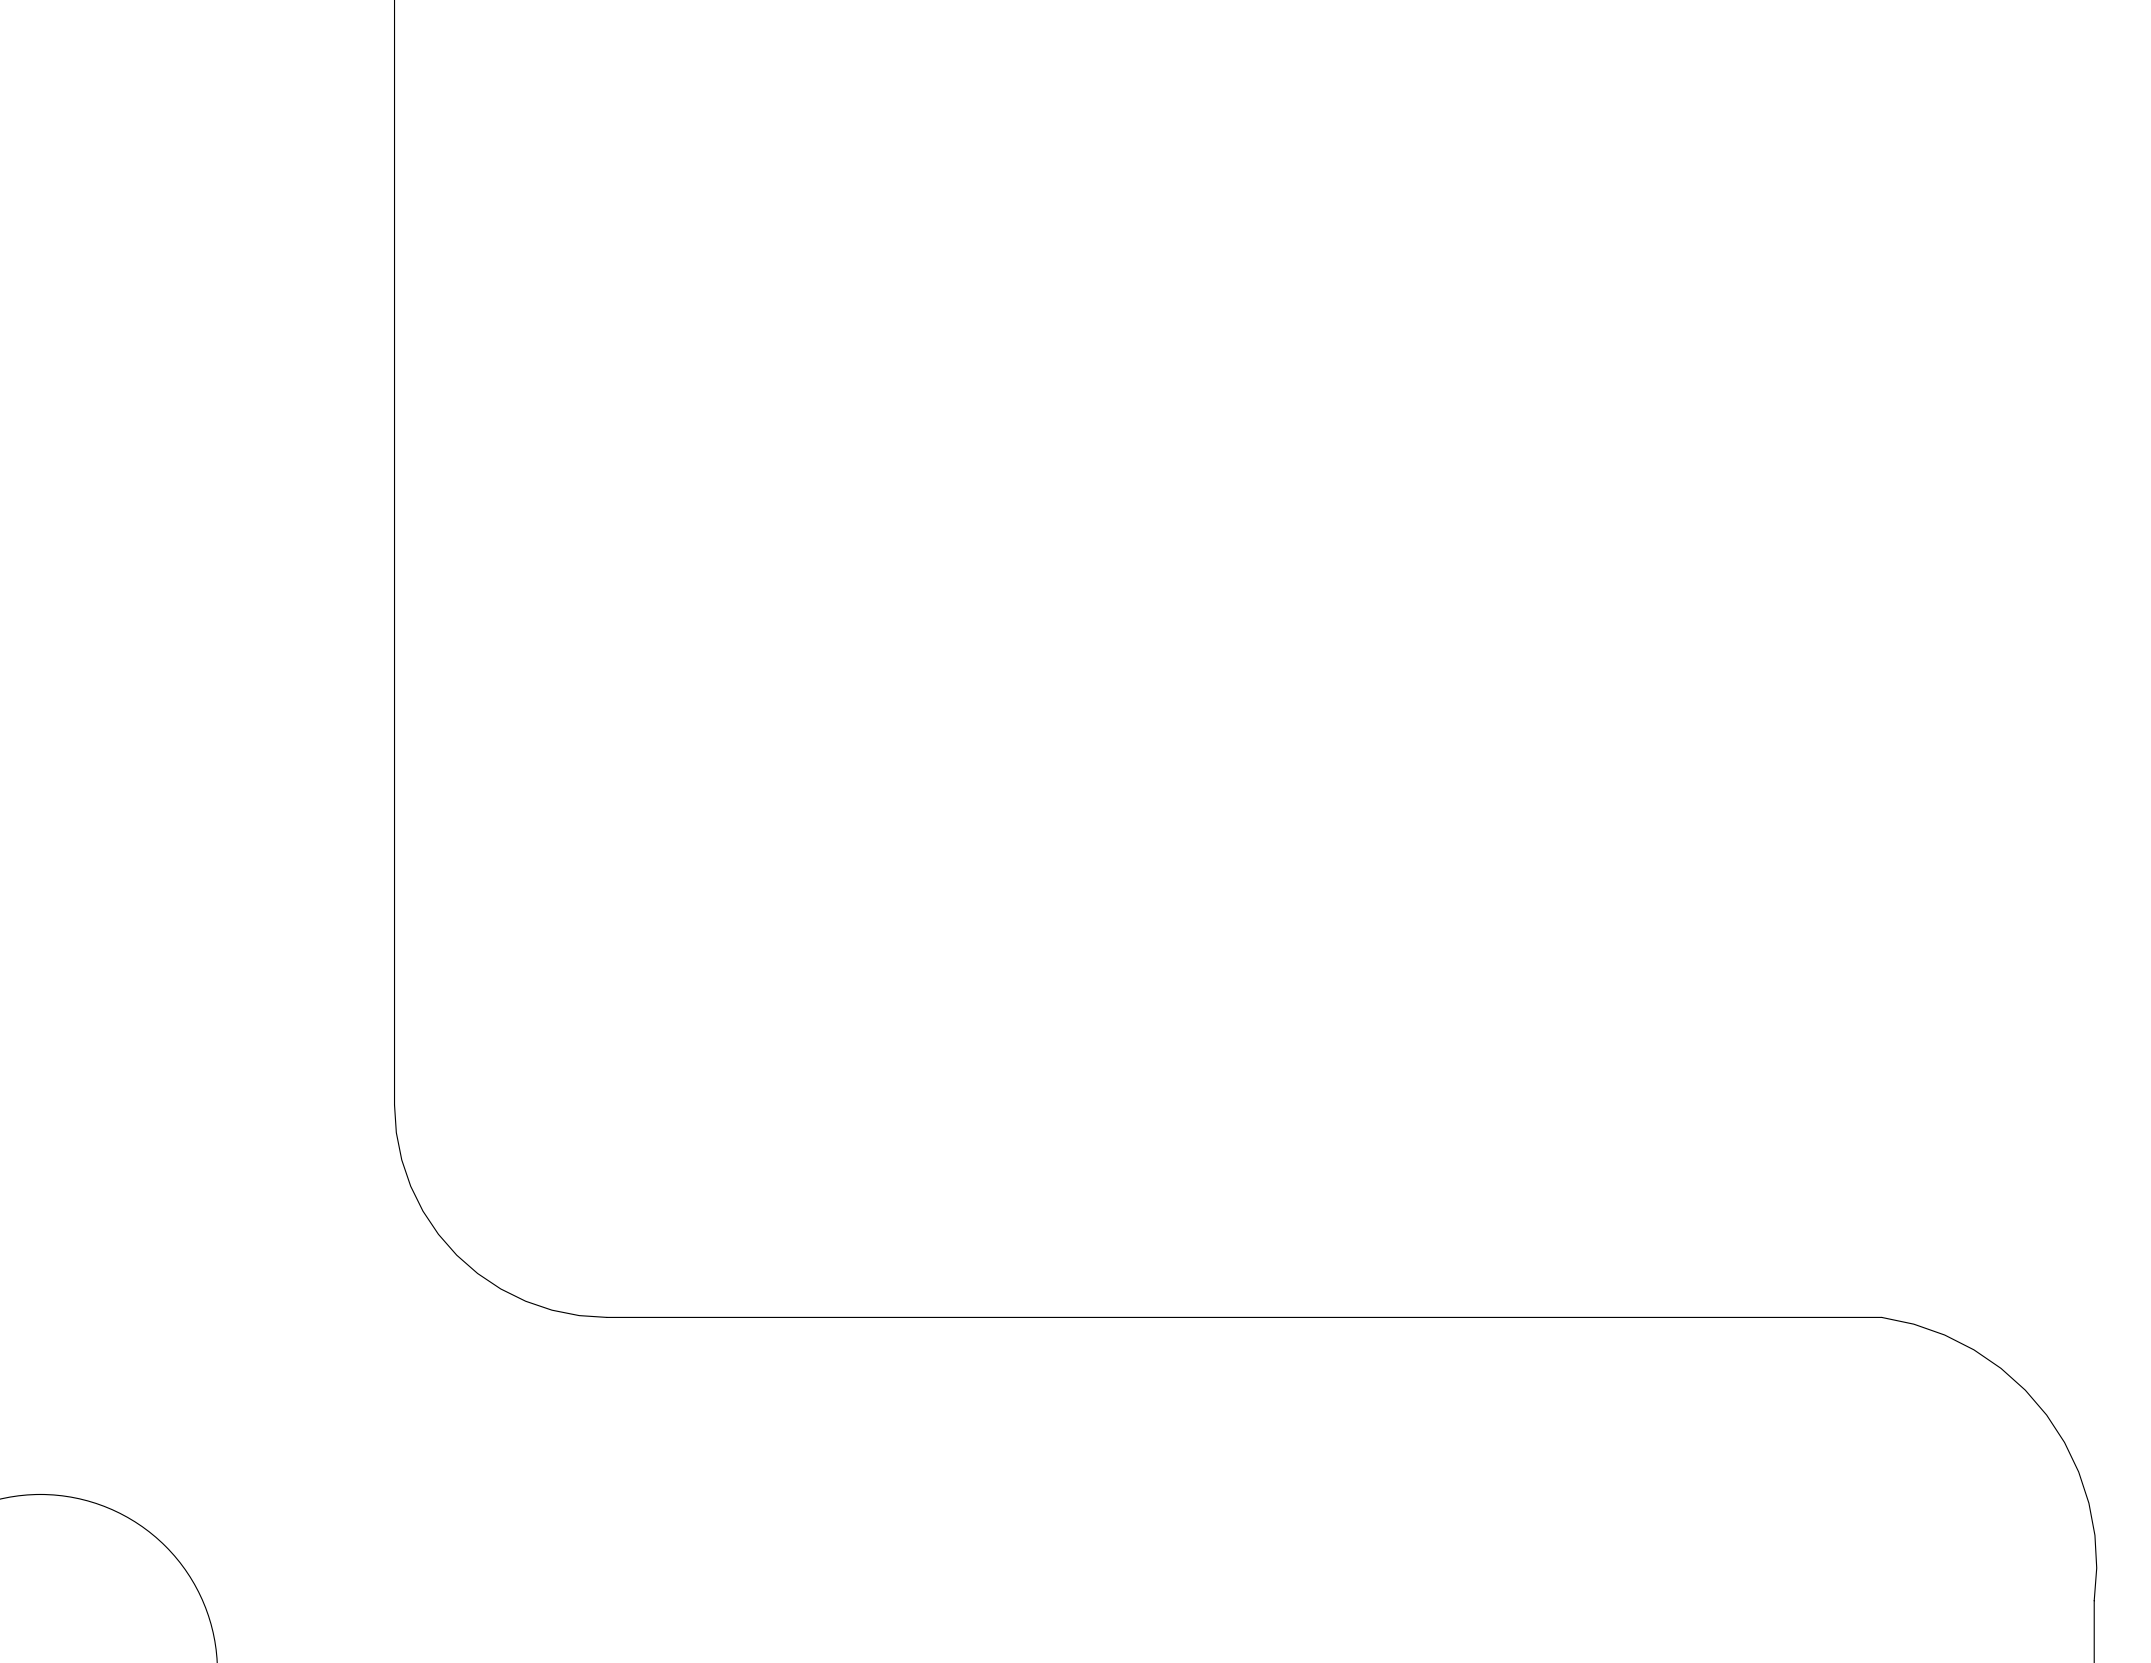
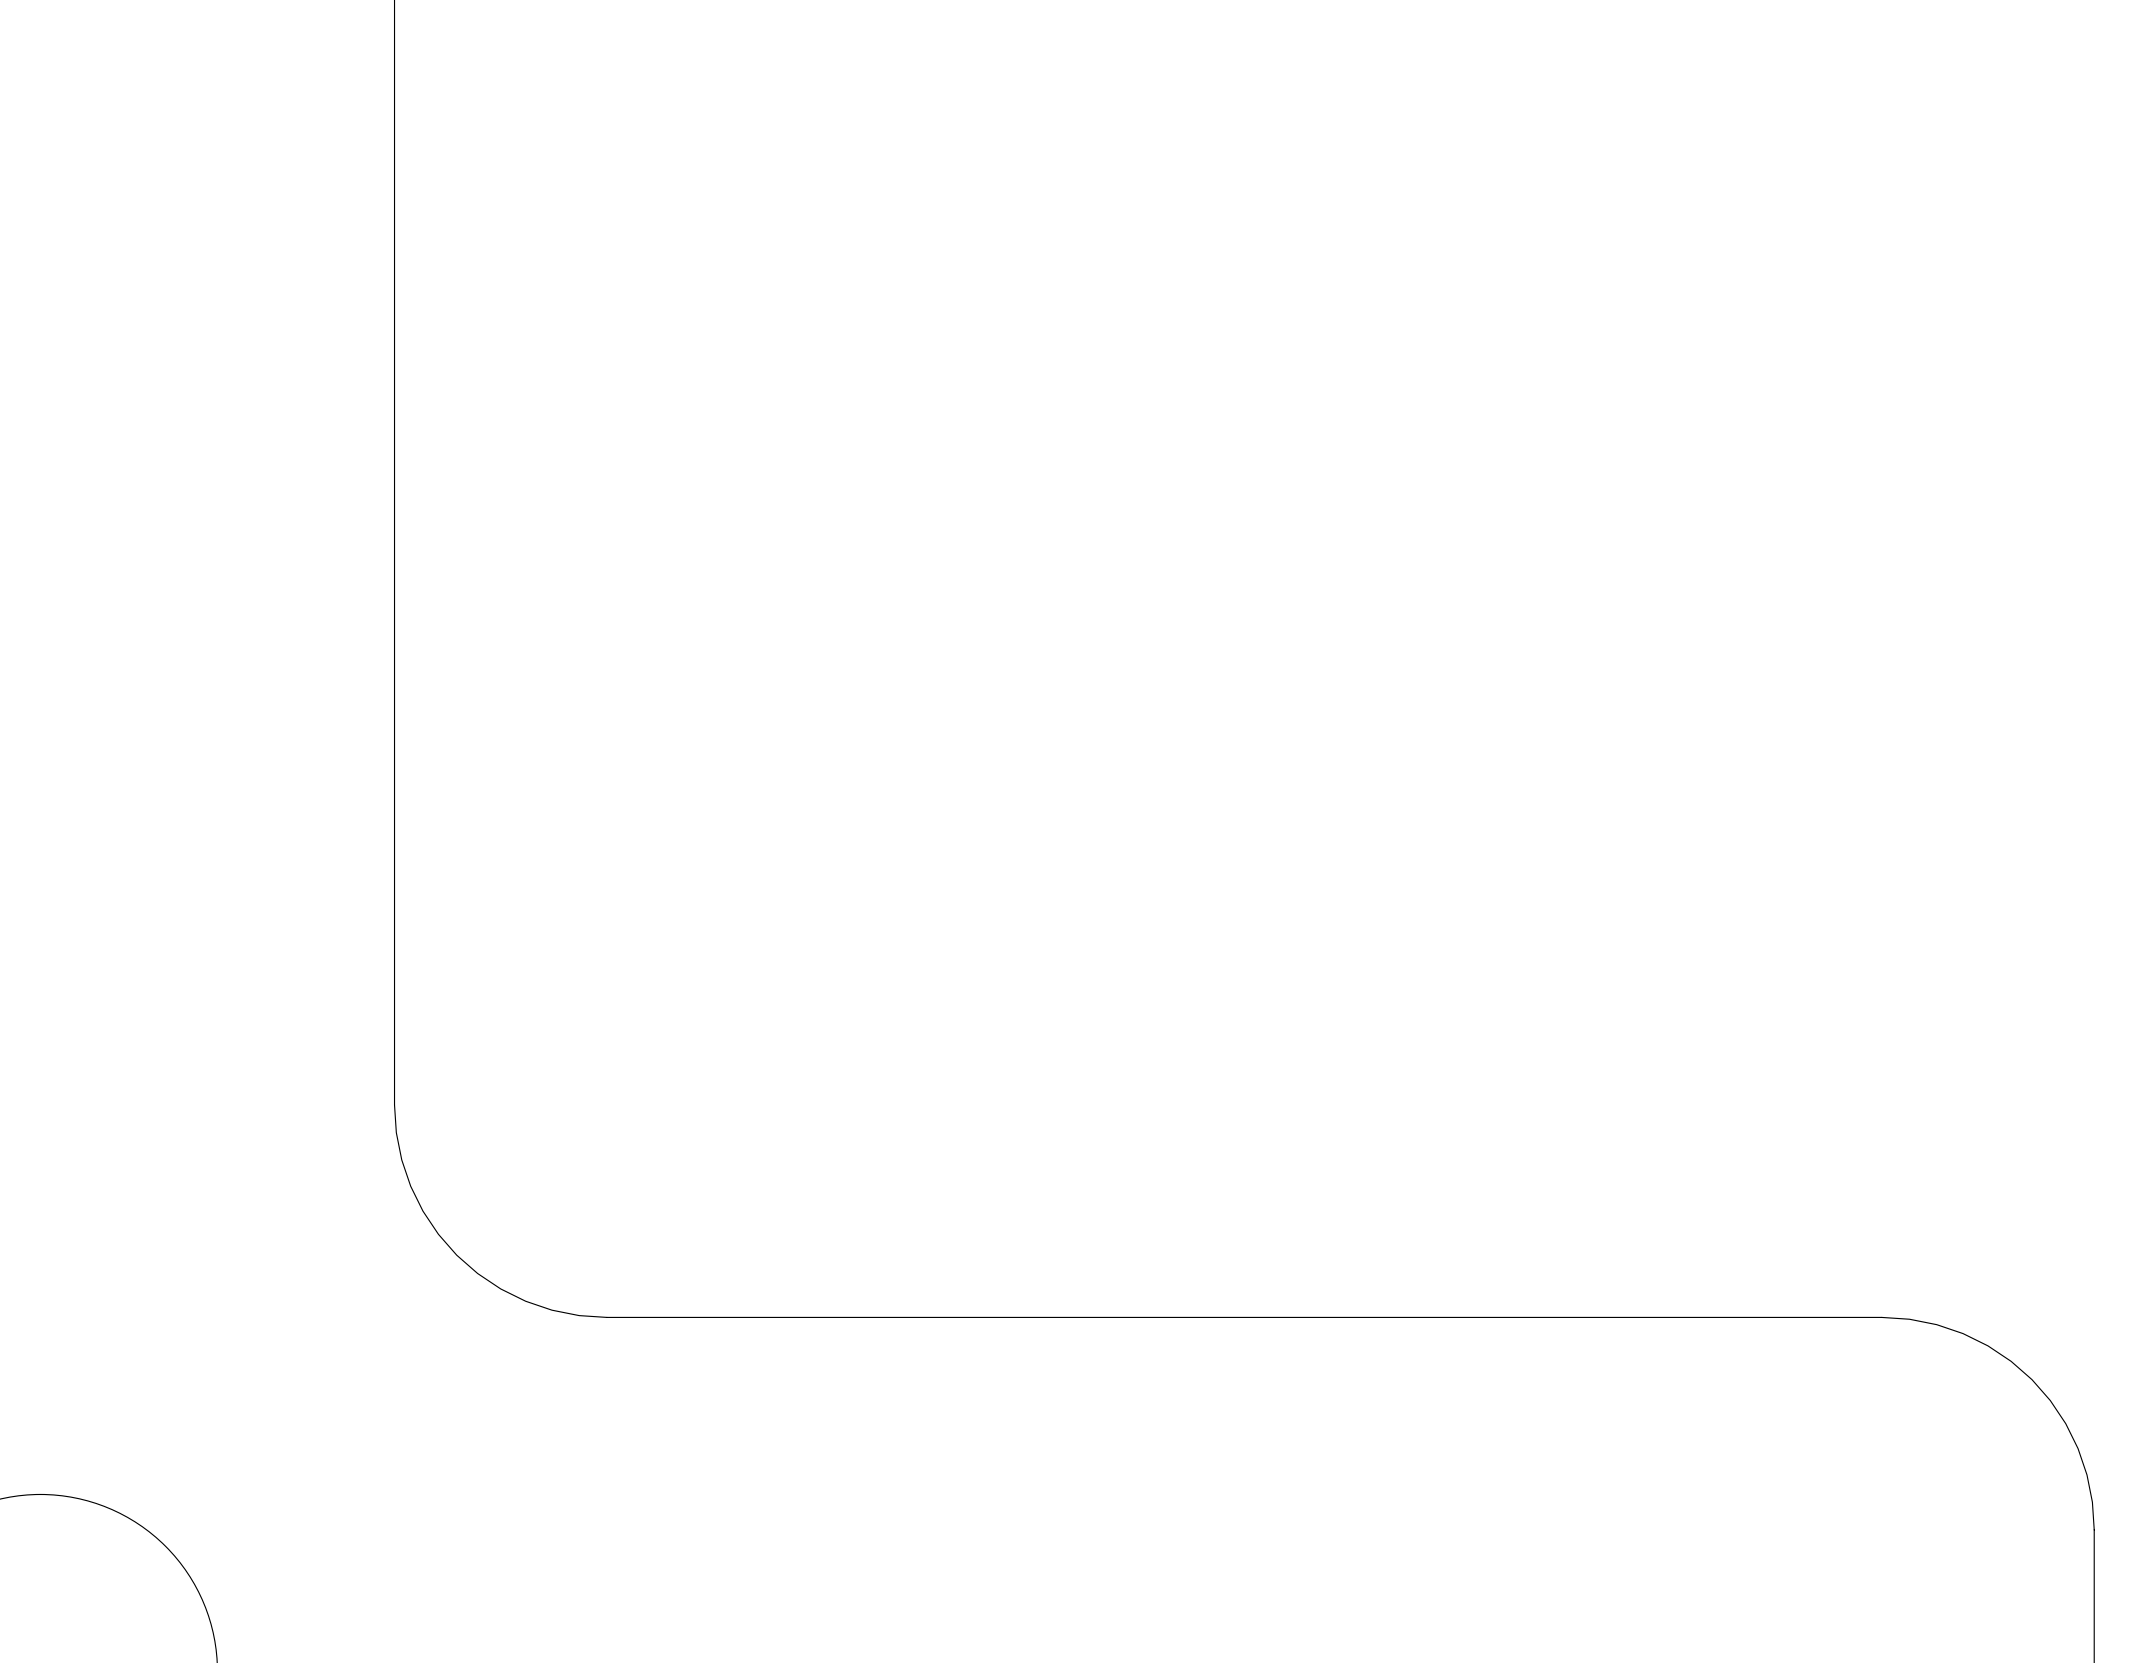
board edge: (1881, 1317) (1913, 1324) (1944, 1335) (1973, 1349) (2000, 1368) (2025, 1390) (2046, 1415) (2064, 1442) (2078, 1472) (2088, 1503) (2094, 1535) (2096, 1568) (2094, 1600) -> (1881, 1317) (1909, 1319) (1936, 1324) (1963, 1333) (1987, 1345) (2011, 1361) (2032, 1379) (2050, 1400) (2065, 1423) (2078, 1448) (2086, 1474) (2092, 1502) (2094, 1529) (2094, 1600)

